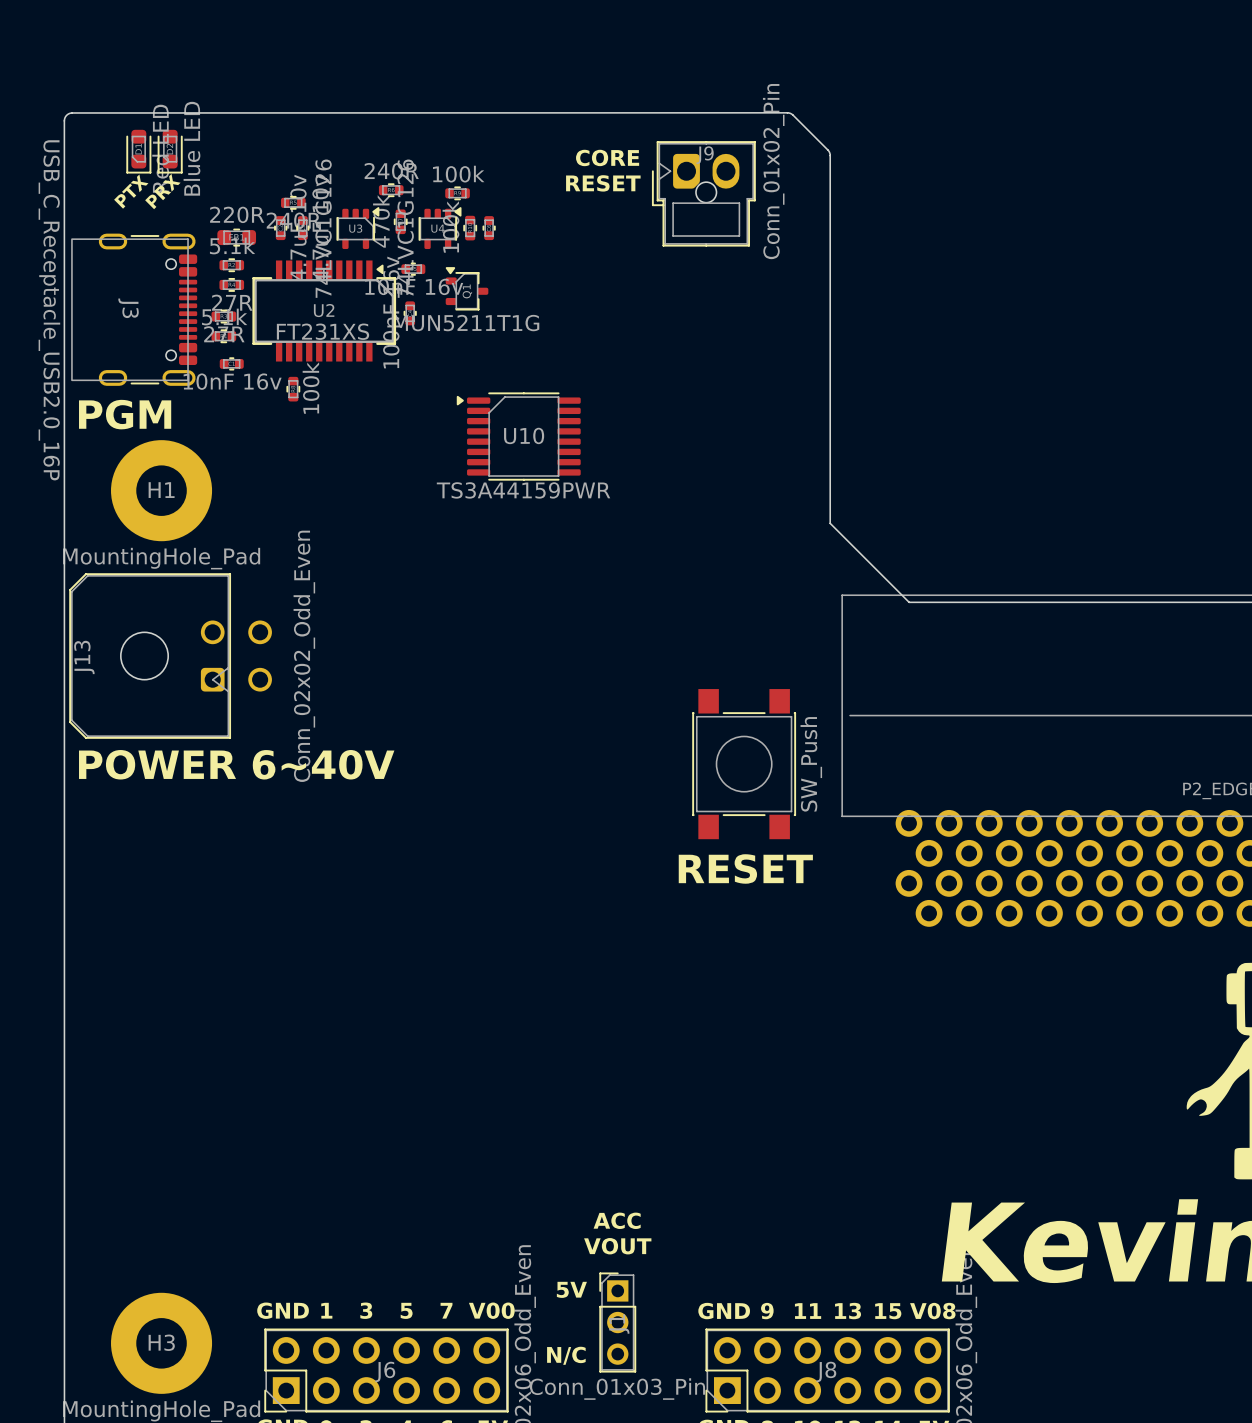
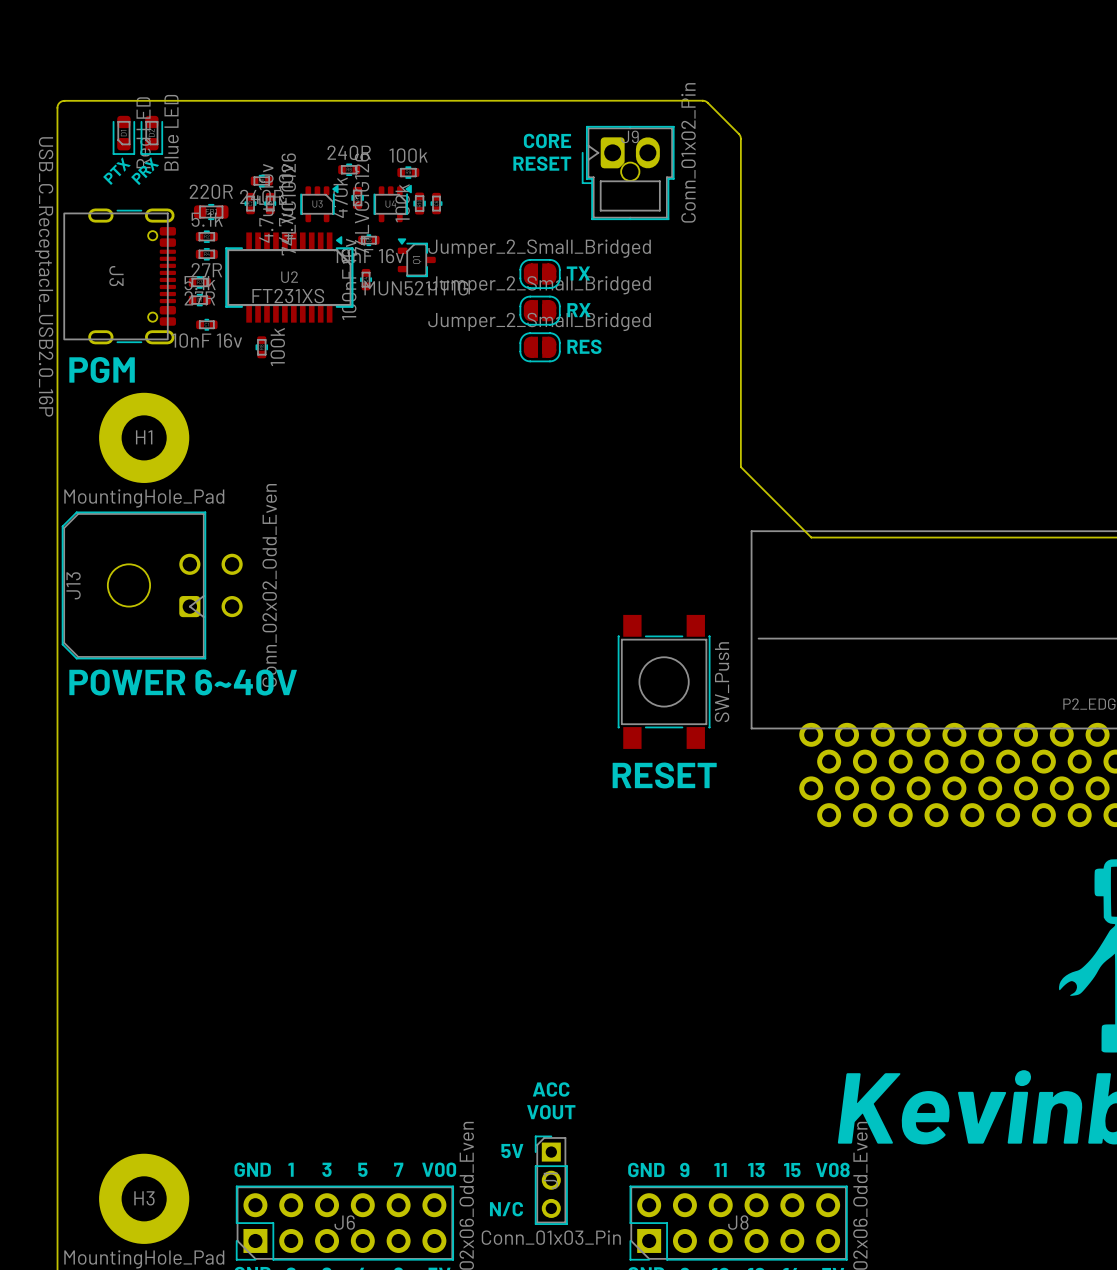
text: none -> TX (578, 273)
part: none -> Jumper_2_Small_Bridged (540, 274)
text: none -> RX (579, 310)
part: none -> Jumper_2_Small_Bridged (540, 310)
text: none -> RES (584, 346)
part: none -> Jumper_2_Small_Bridged (540, 347)
U10: TS3A44159PWR (518, 436) -> none

